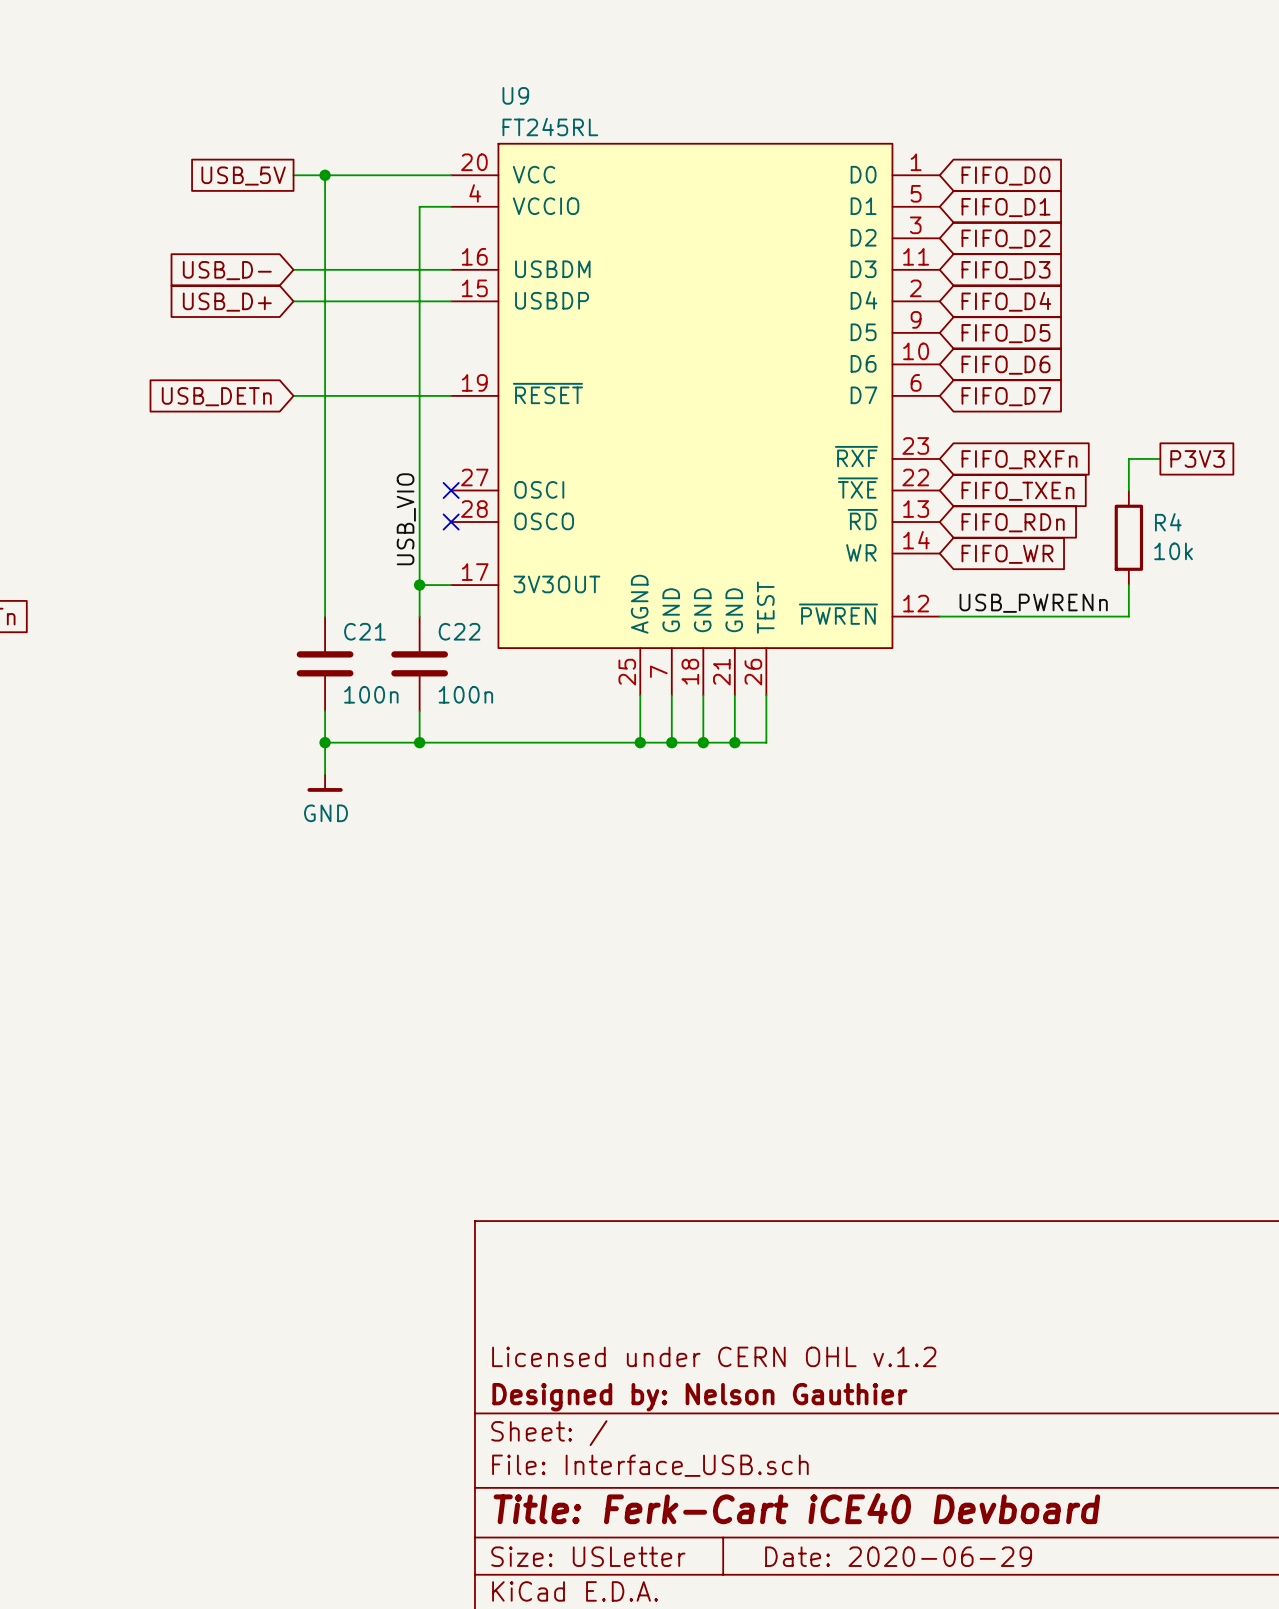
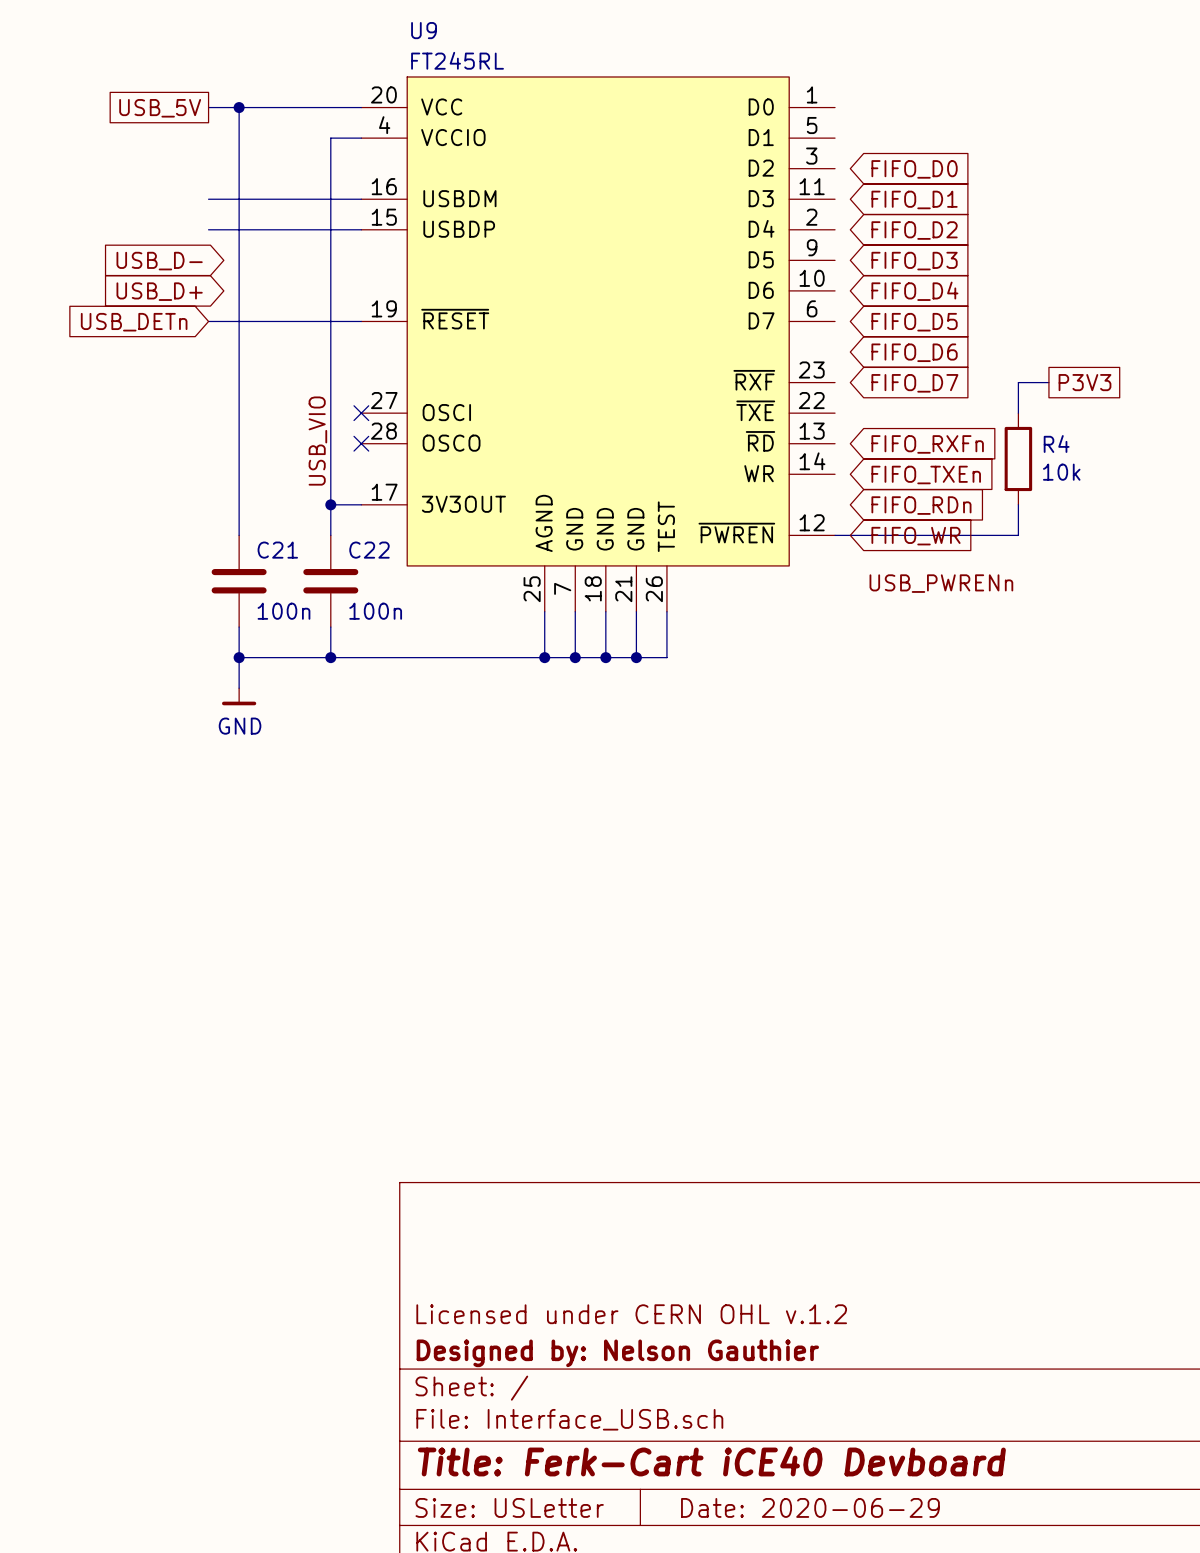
wire: none -> (361, 138) (330, 138) (330, 535)
wire: (293, 175) (451, 175) -> (208, 107) (361, 107)
wire: (325, 175) (325, 616) -> (239, 107) (239, 535)
junction position: (325, 175) -> (239, 107)
global label position: USB_5V (243, 176) -> USB_5V (160, 108)
wire: (419, 206) (419, 616) -> (346, 199) (208, 199)
wire: (293, 269) (451, 269) -> none
wire: (293, 301) (451, 301) -> (208, 229) (361, 229)
wire: (293, 395) (451, 395) -> (208, 321) (361, 321)
global label position: USB_DETn (216, 396) -> USB_DETn (134, 322)
U9 position: (695, 419) -> (598, 344)
no-connect mark: none -> (361, 413)
no-connect mark: none -> (361, 443)
wire: (1160, 458) (1128, 458) (1128, 490) -> (1048, 382) (1018, 382) (1018, 413)
global label position: P3V3 (1197, 458) -> P3V3 (1084, 382)
no-connect mark: (451, 490) -> none
label position: USB_VIO (406, 519) -> USB_VIO (317, 441)
junction: none -> (330, 504)
no-connect mark: (451, 522) -> none
R4 position: (1128, 537) -> (1018, 458)
wire: (419, 585) (451, 585) -> (330, 504) (361, 504)
junction: (419, 585) -> none
wire: (1128, 585) (1128, 616) (939, 616) -> (1018, 504) (1018, 535) (835, 535)
C21 position: (325, 663) -> (239, 581)
C22 position: (419, 663) -> (330, 581)
junction: none -> (239, 657)
junction: none -> (330, 657)
junction: none -> (544, 657)
junction: none -> (575, 657)
junction: none -> (605, 657)
junction: none -> (636, 657)
wire: (640, 695) (640, 742) -> (544, 611) (544, 657)
wire: (671, 695) (671, 742) -> (575, 611) (575, 657)
wire: (703, 695) (703, 742) -> (605, 611) (605, 657)
wire: (734, 695) (734, 742) -> (636, 611) (636, 657)
wire: (766, 695) (766, 742) (325, 742) -> (666, 611) (666, 657) (239, 657)
wire: (325, 711) (325, 774) -> (239, 627) (239, 688)
wire: (419, 711) (419, 742) -> (330, 627) (330, 657)
junction: (325, 742) -> none
junction: (419, 742) -> none
junction: (640, 742) -> none
junction: (671, 742) -> none
junction: (703, 742) -> none
junction: (734, 742) -> none
power symbol position: GND (325, 783) -> GND (239, 696)

